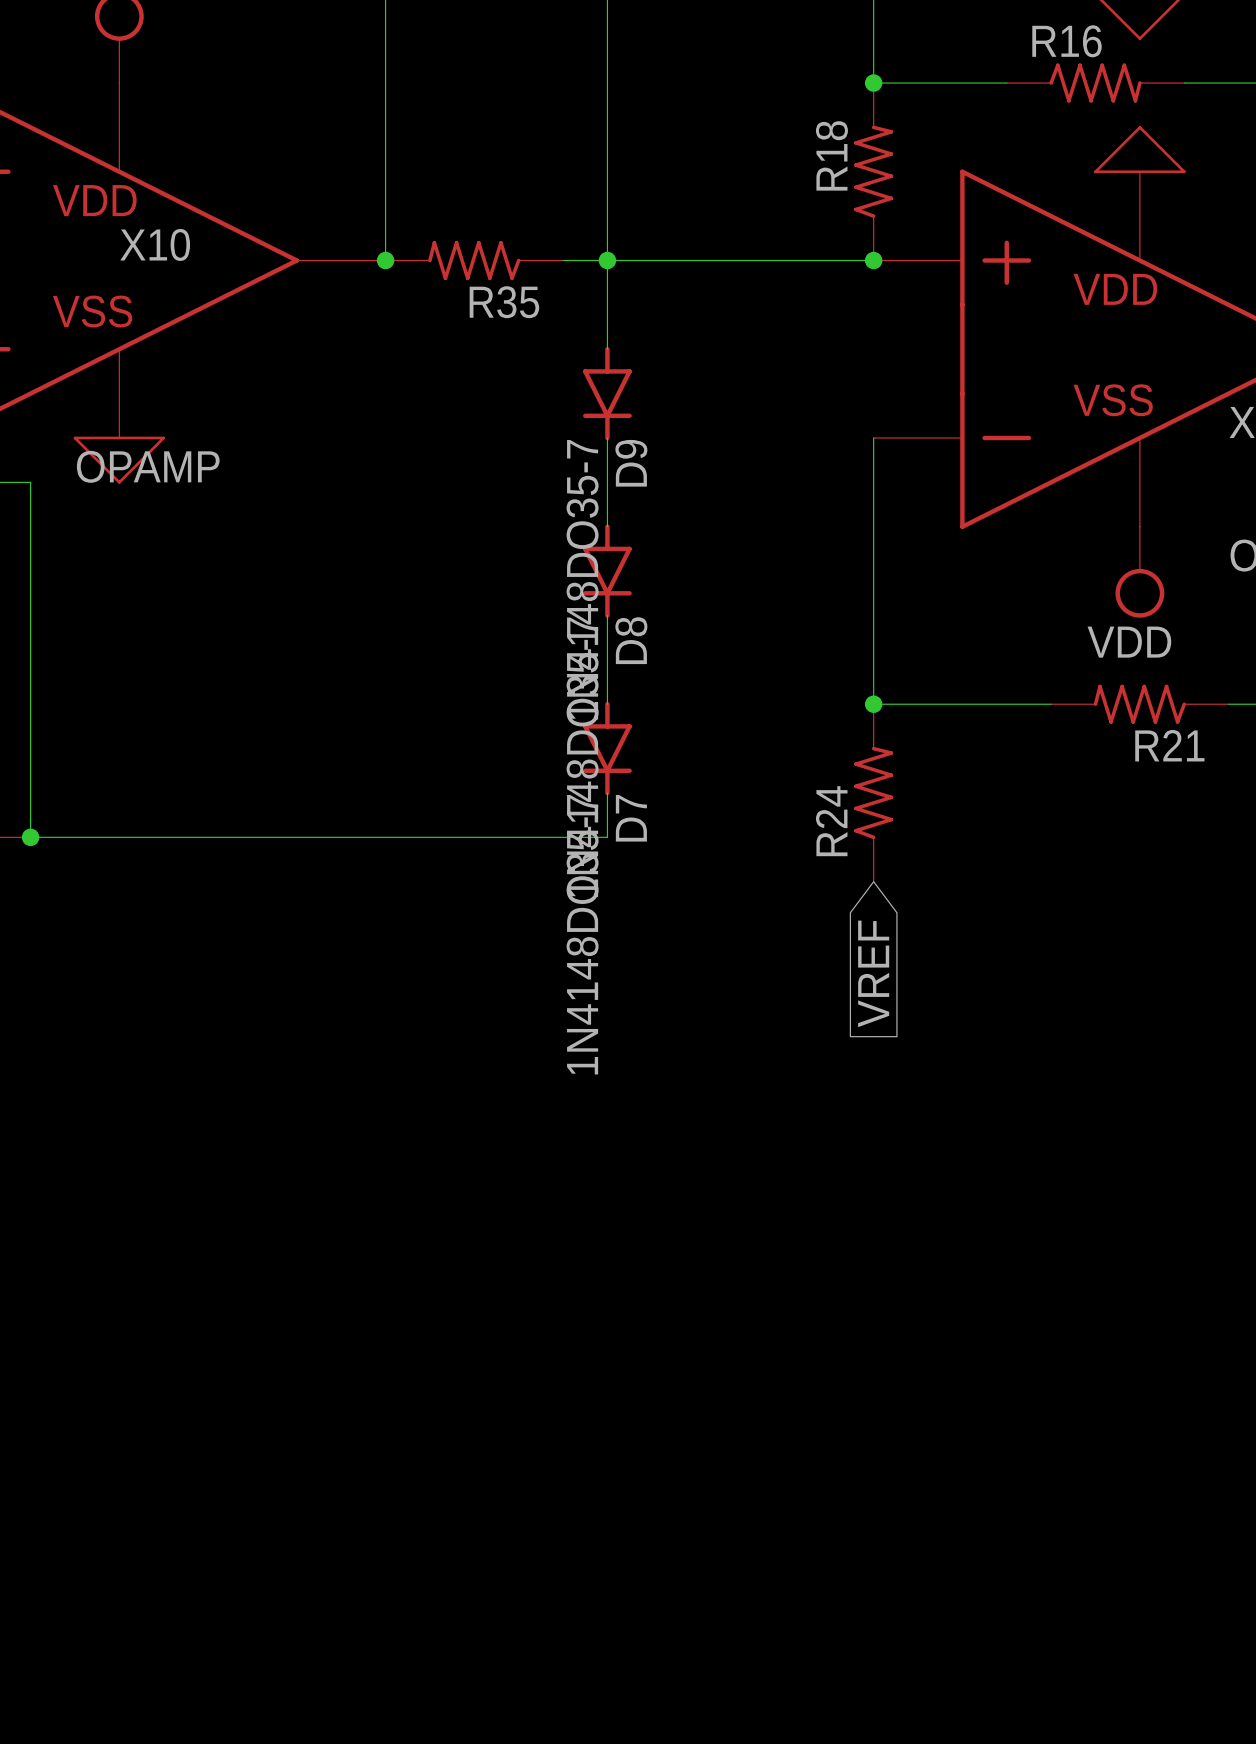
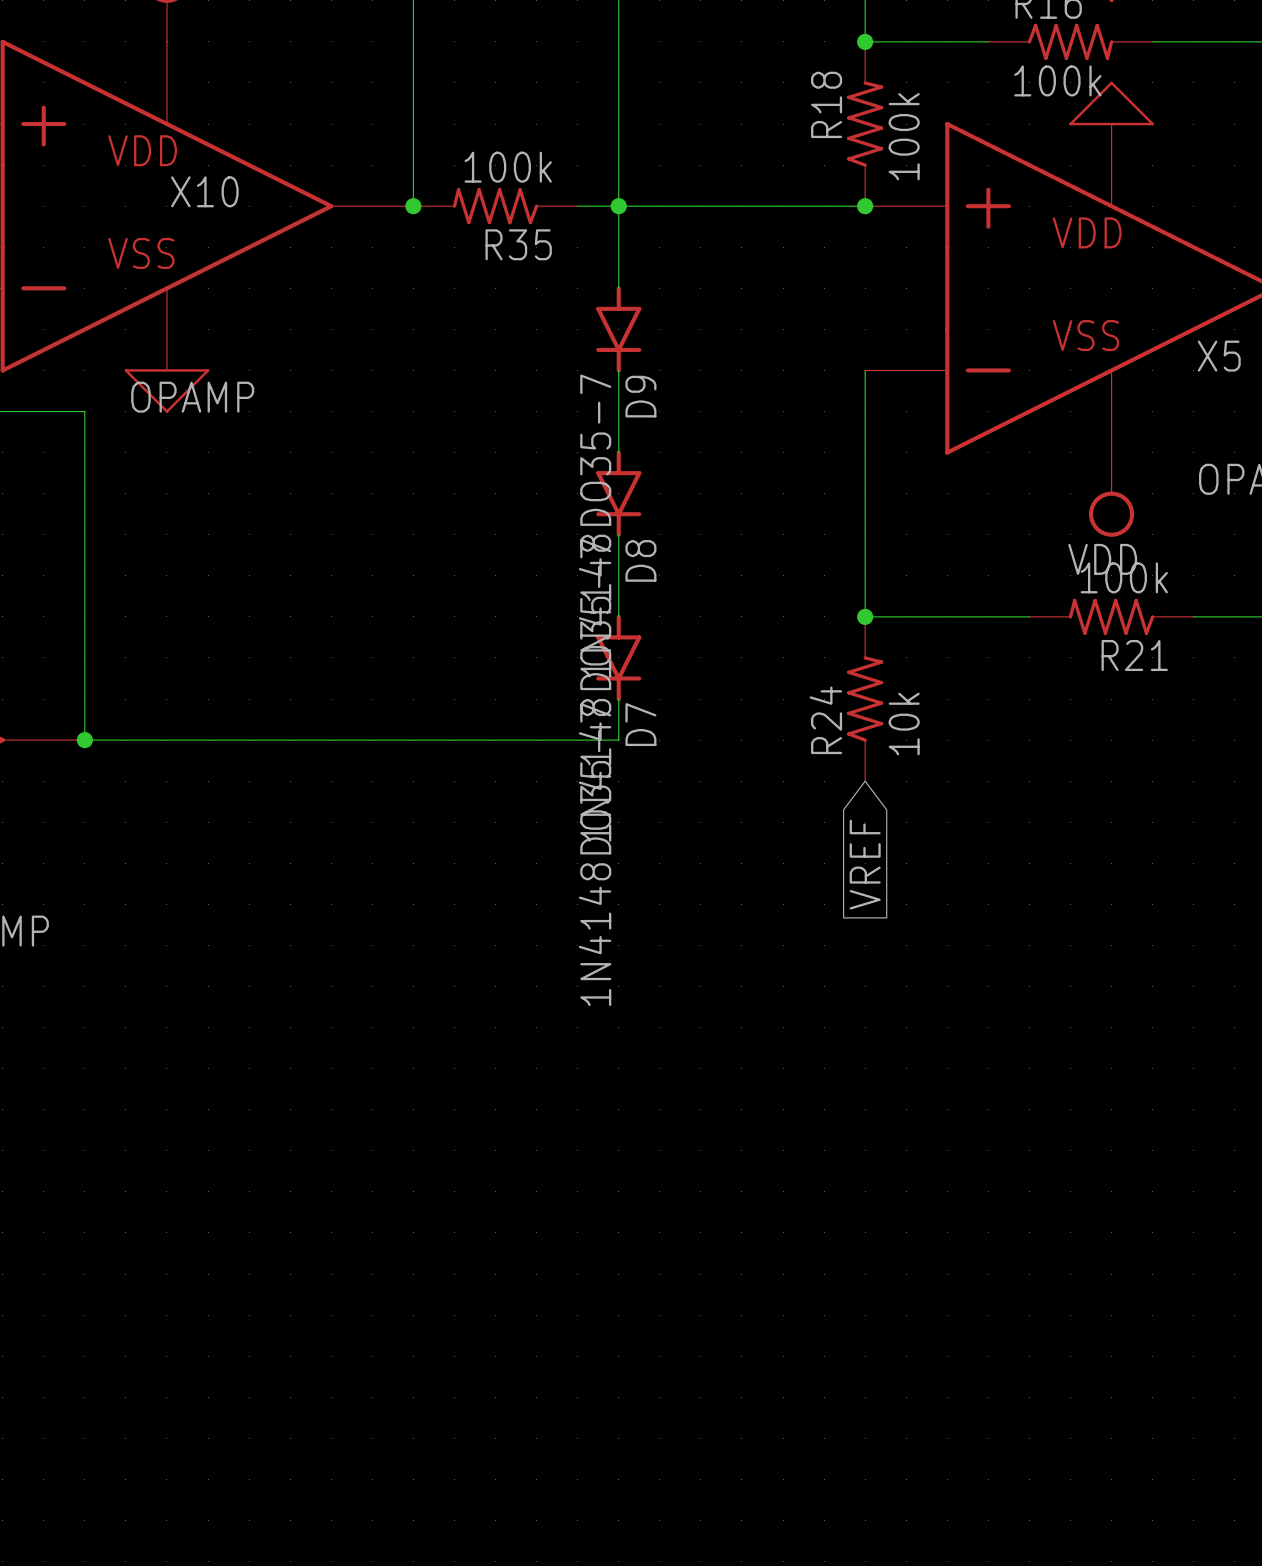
R16 value: none -> 100k (1057, 80)
R18 value: none -> 100k (904, 136)
R35 value: none -> 100k (508, 167)
R21 value: none -> 100k (1124, 577)
R24 value: none -> 10k (904, 724)

